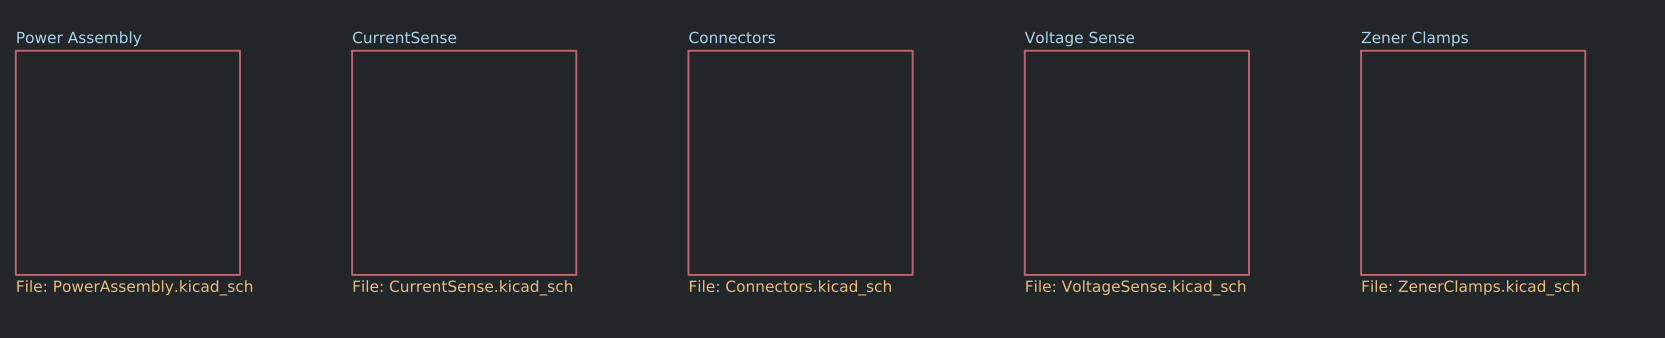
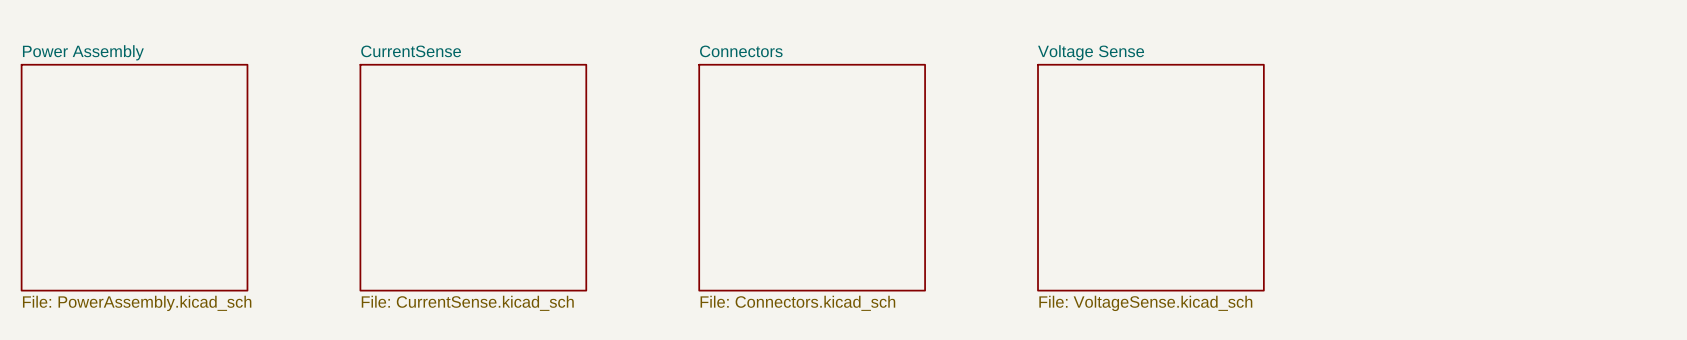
sheet Zener Clamps: File: ZenerClamps.kicad_sch (1473, 162) -> none

